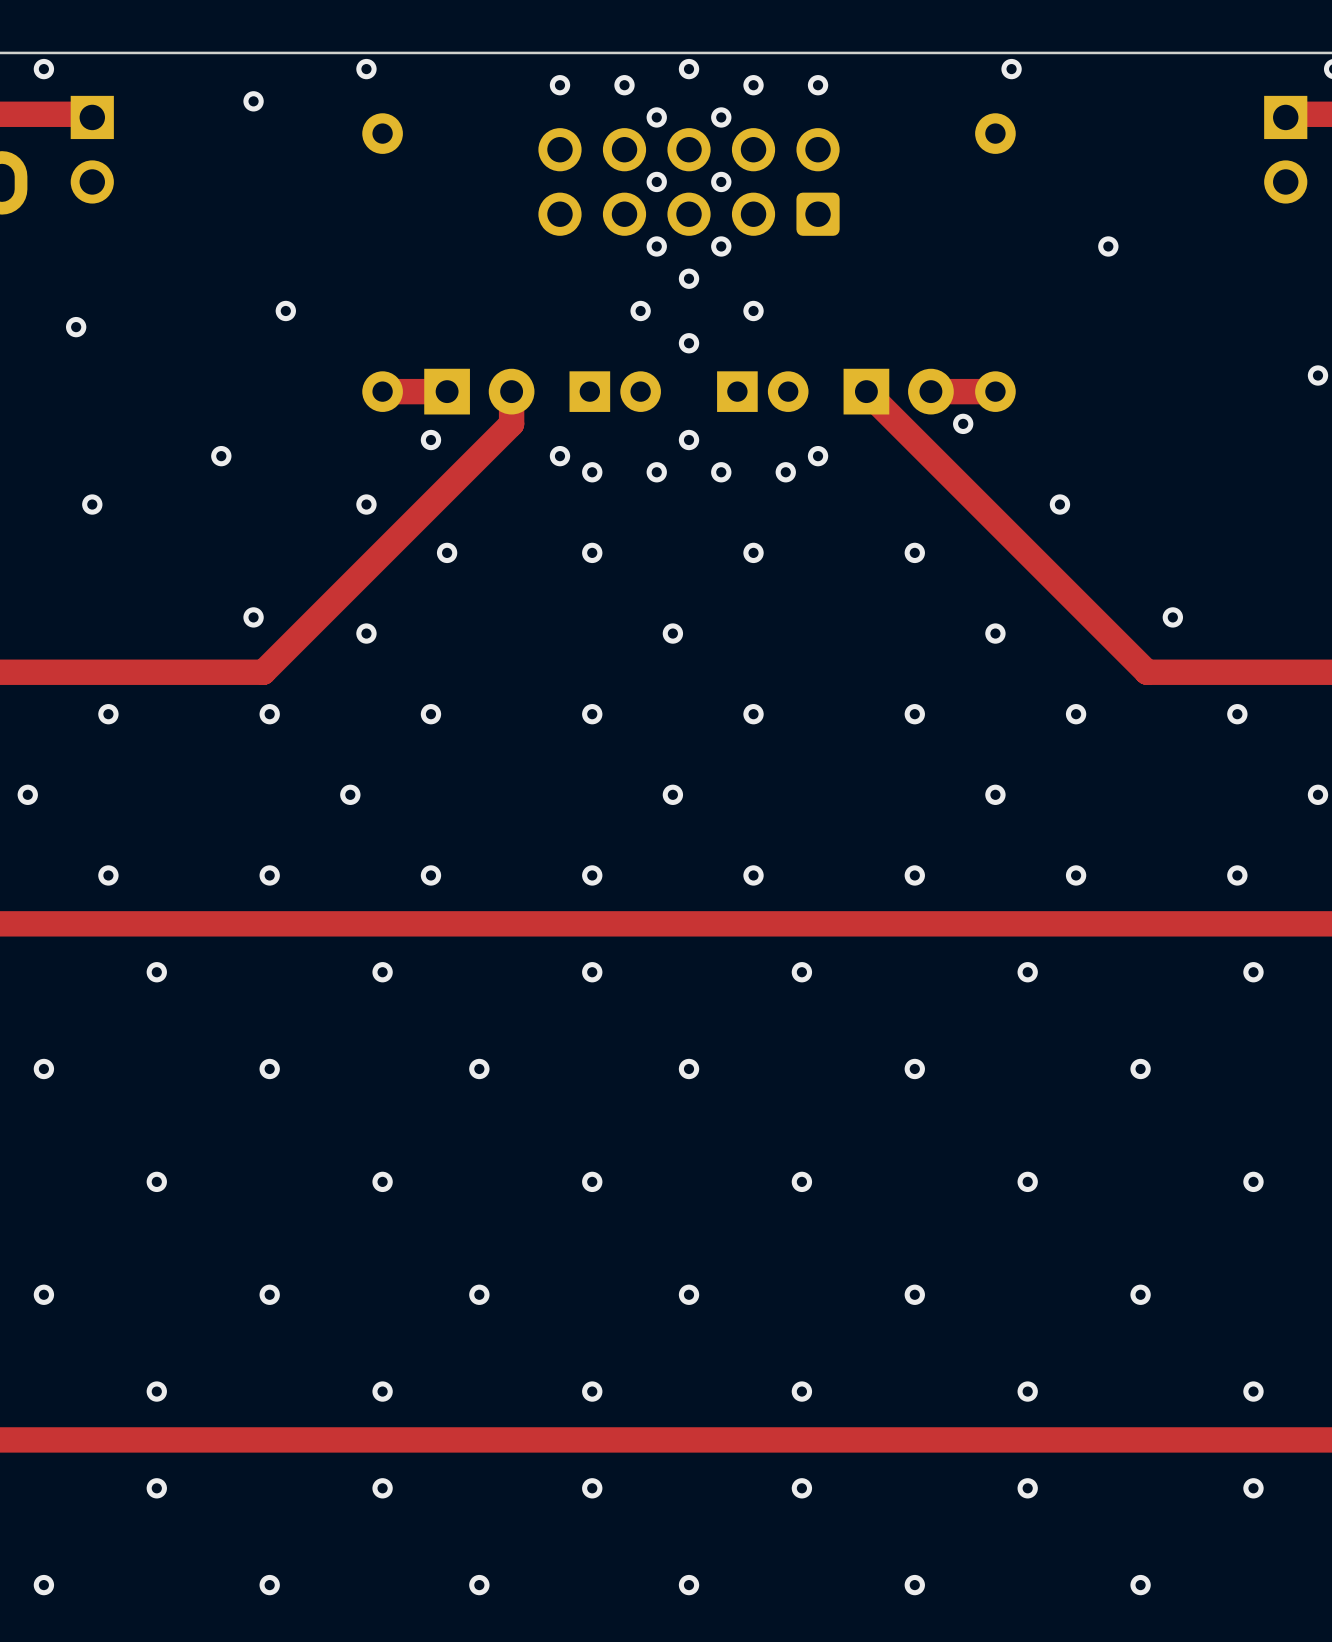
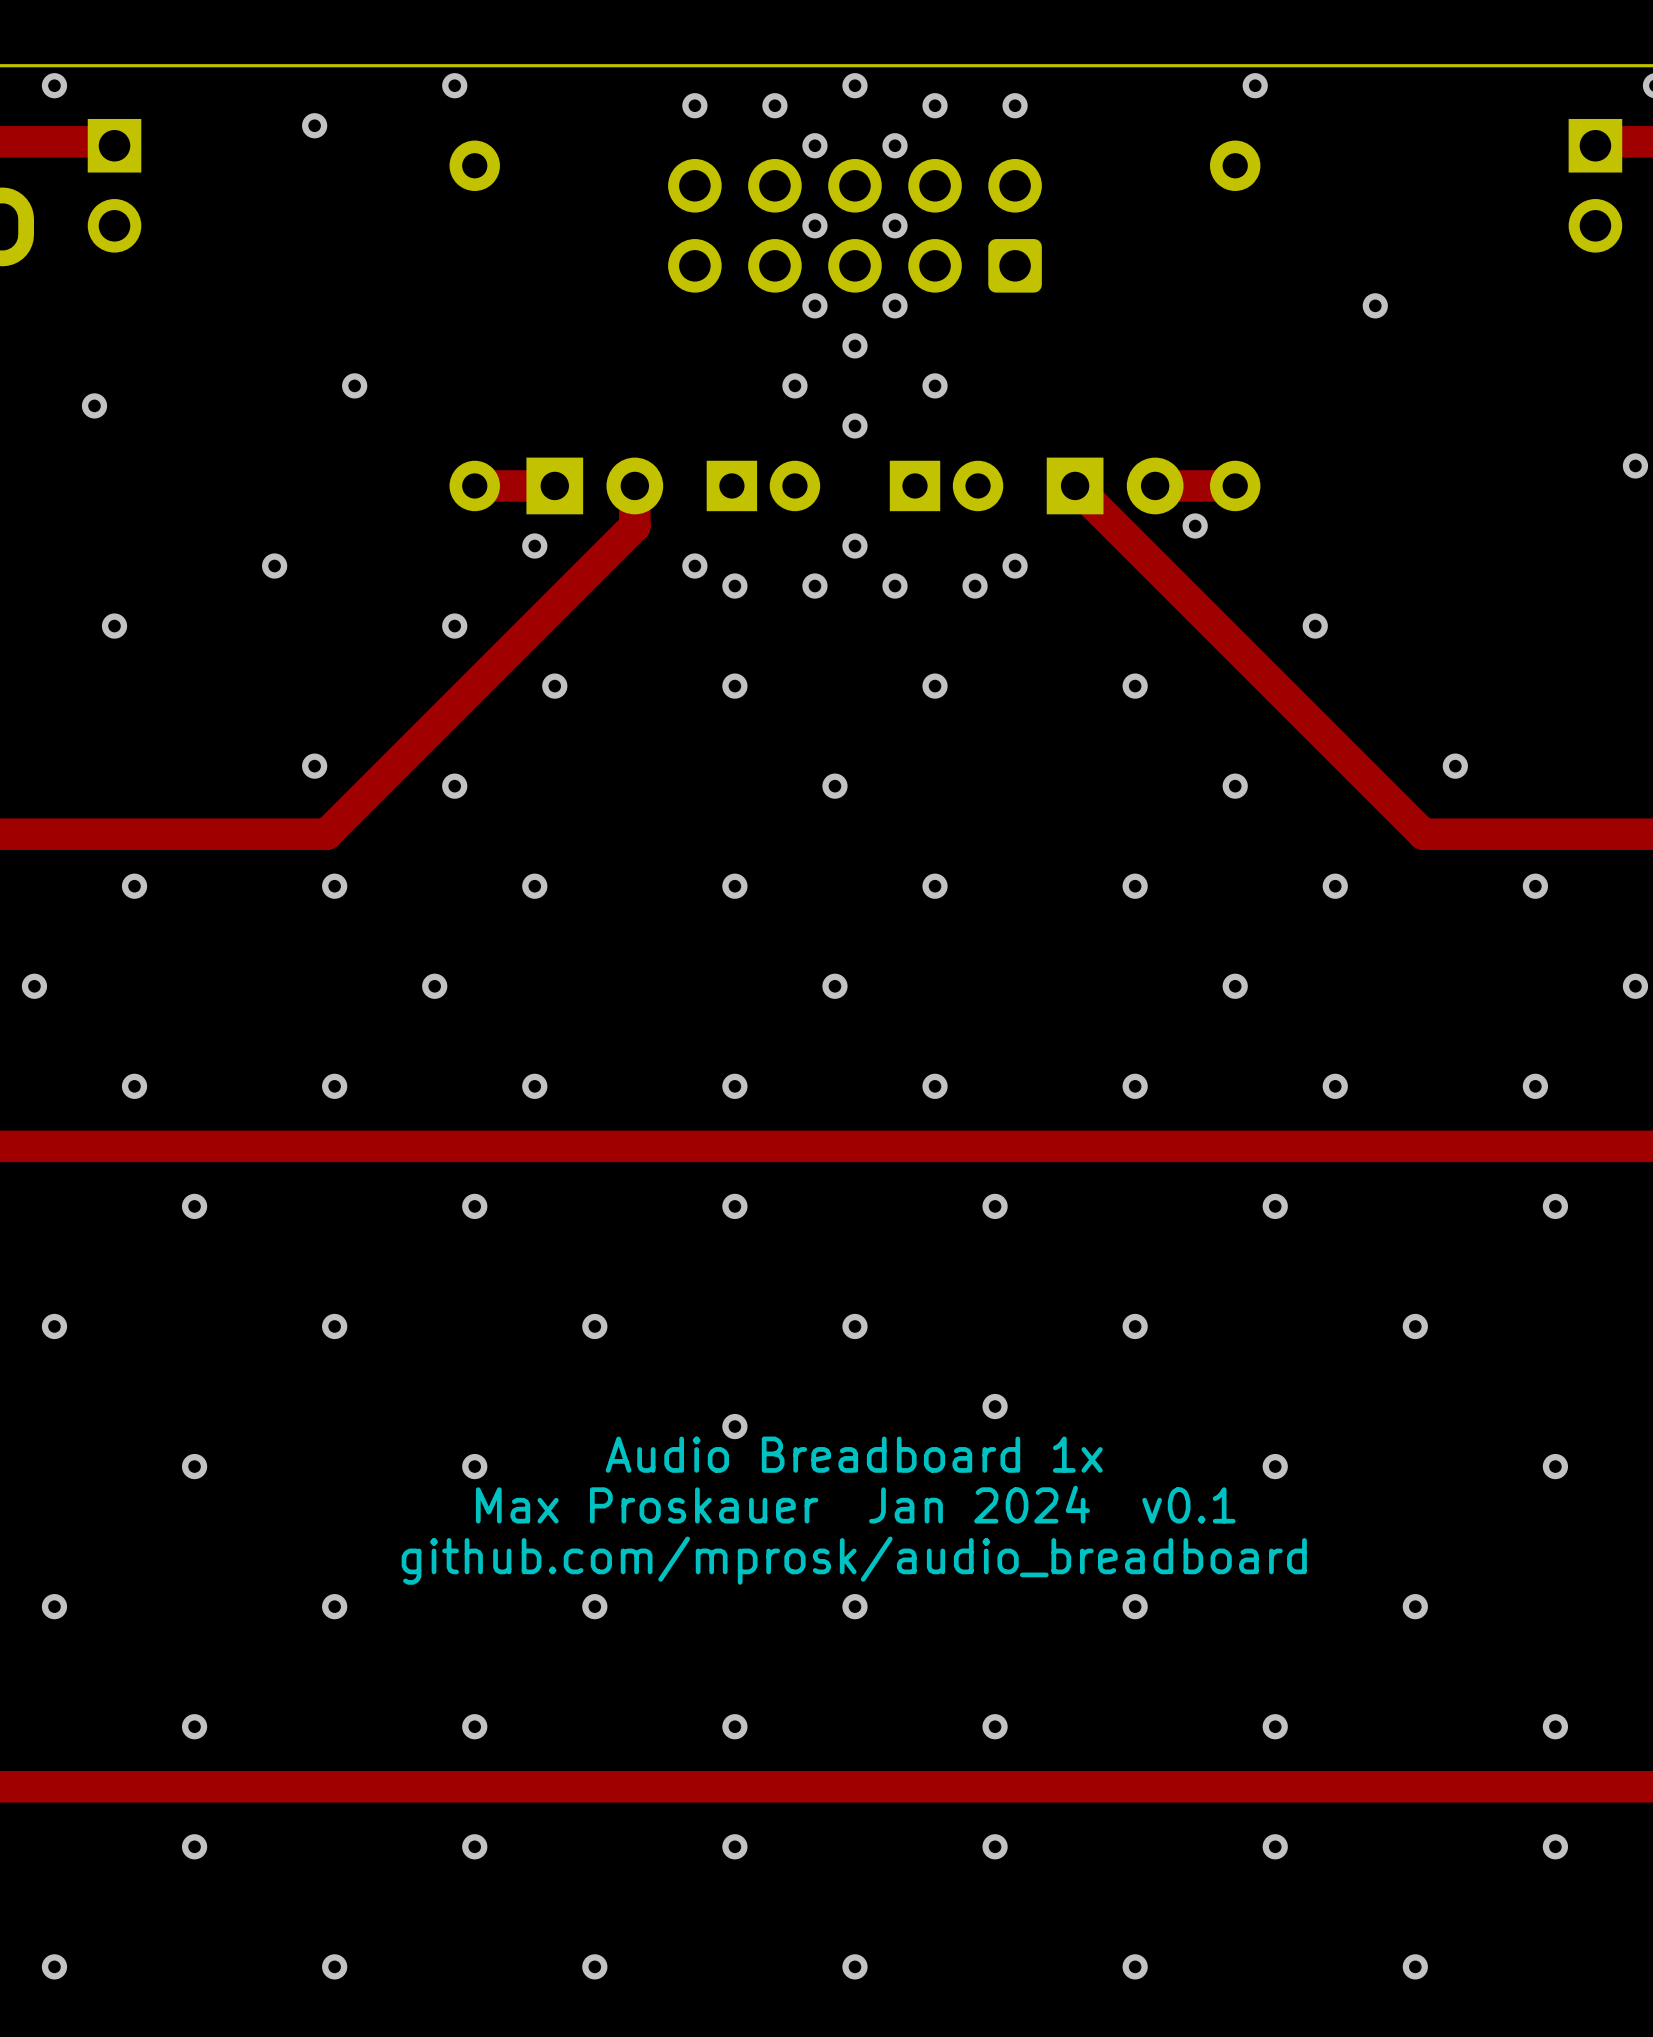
text: none -> Audio Breadboard 1x (854, 1454)
via position: (592, 1181) -> (734, 1426)
via position: (801, 1181) -> (995, 1406)
text: none -> Max Proskauer Jan 2024 v0.1 (855, 1504)
text: none -> github.com/mprosk/audio_breadboard (854, 1560)

